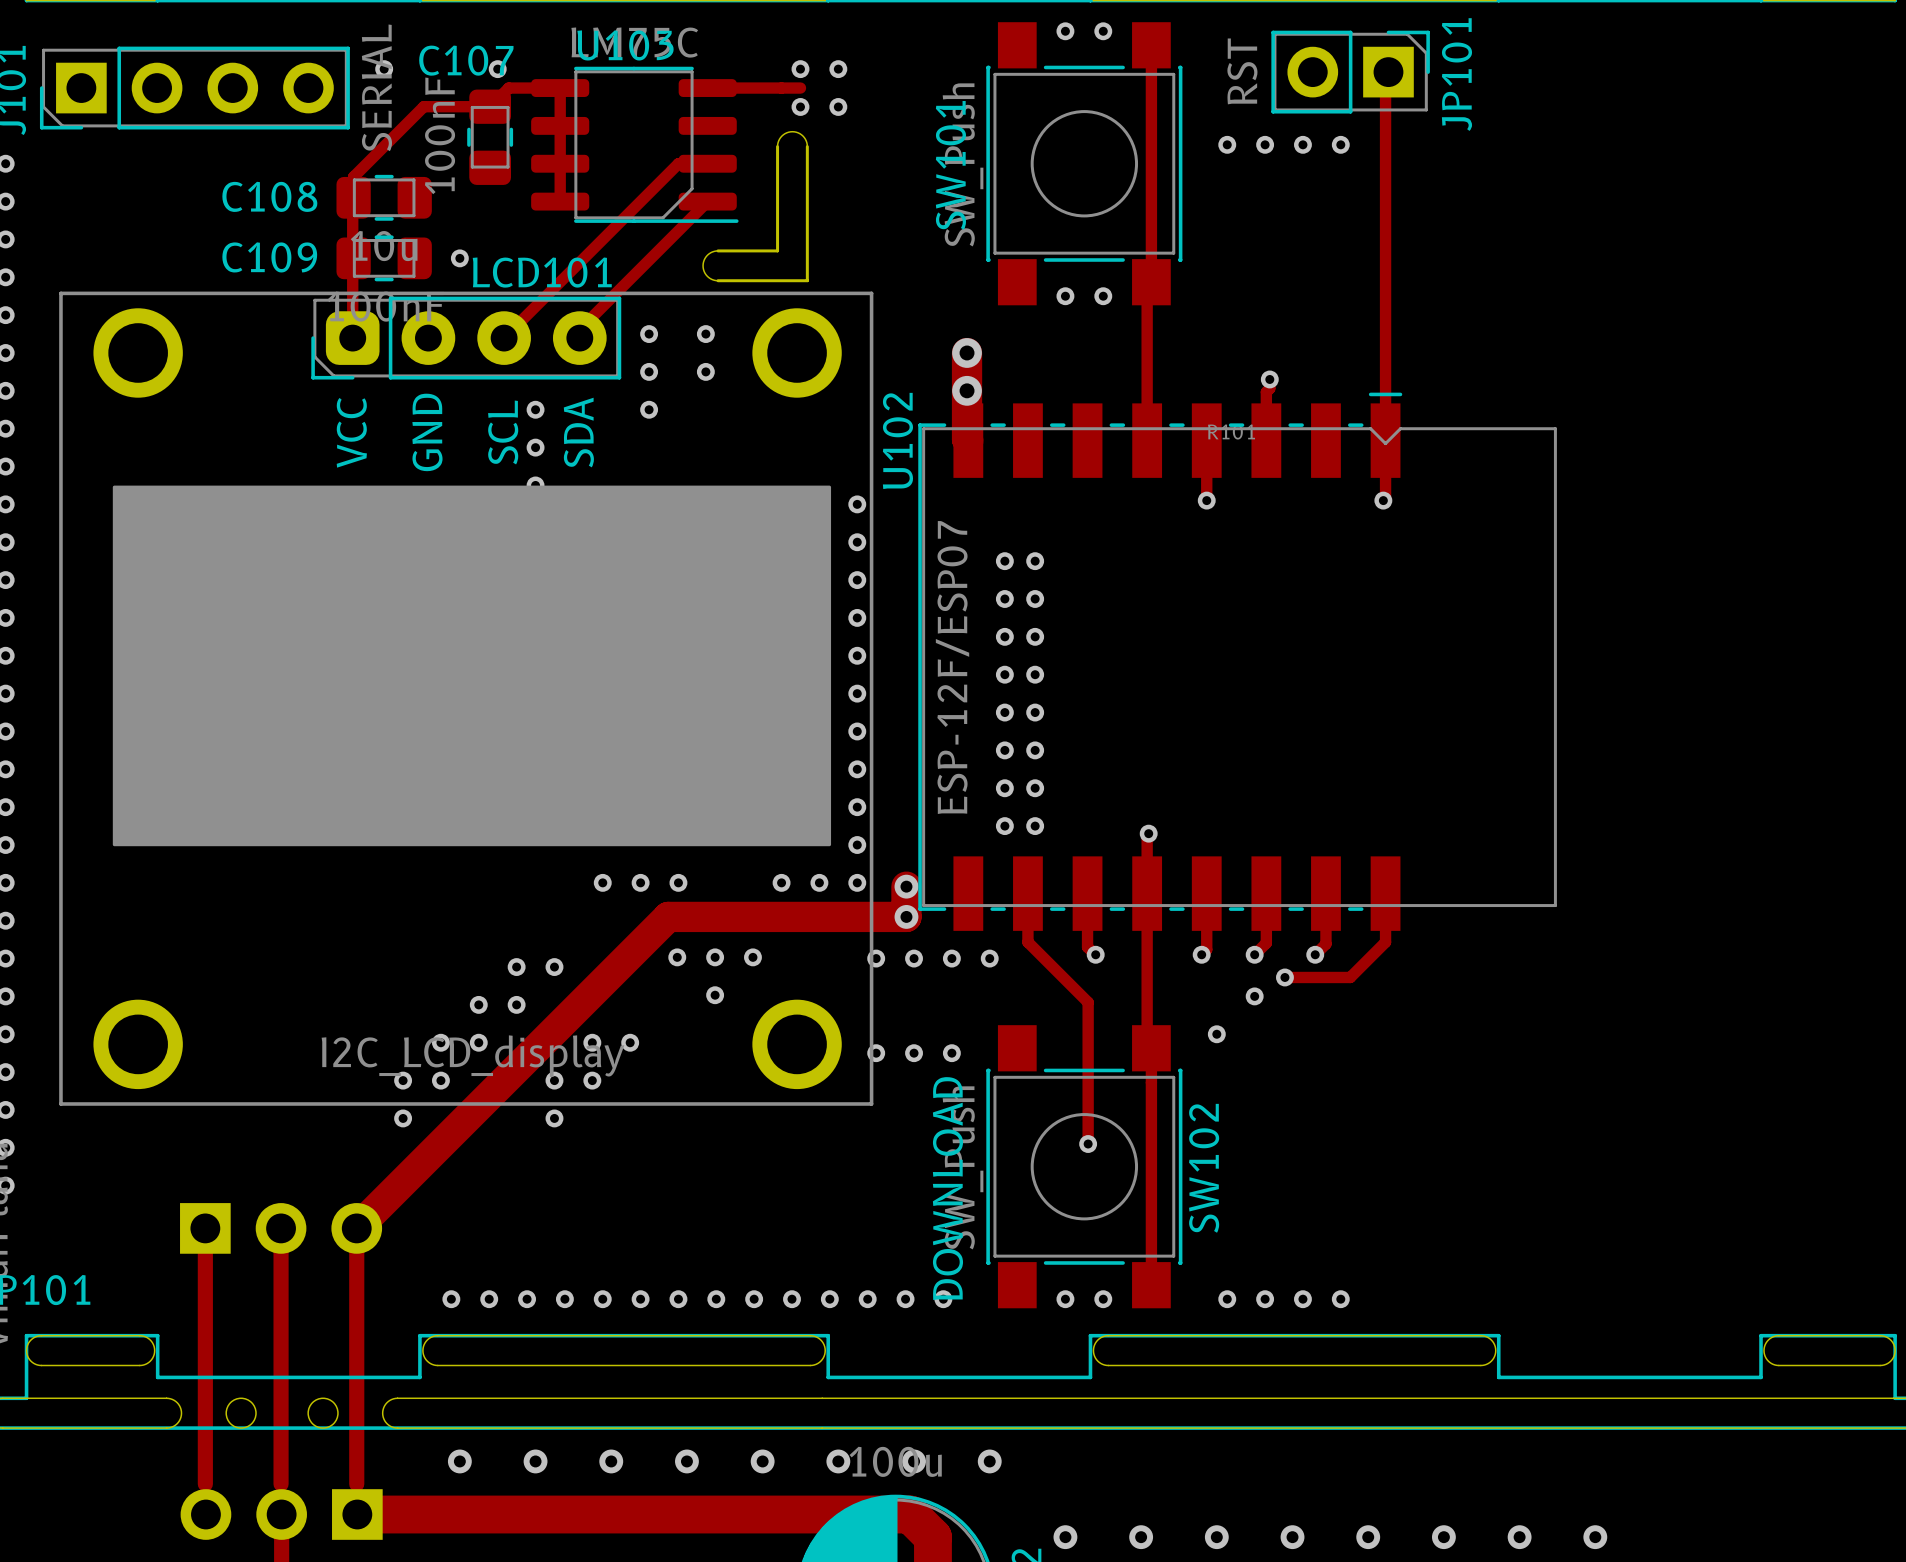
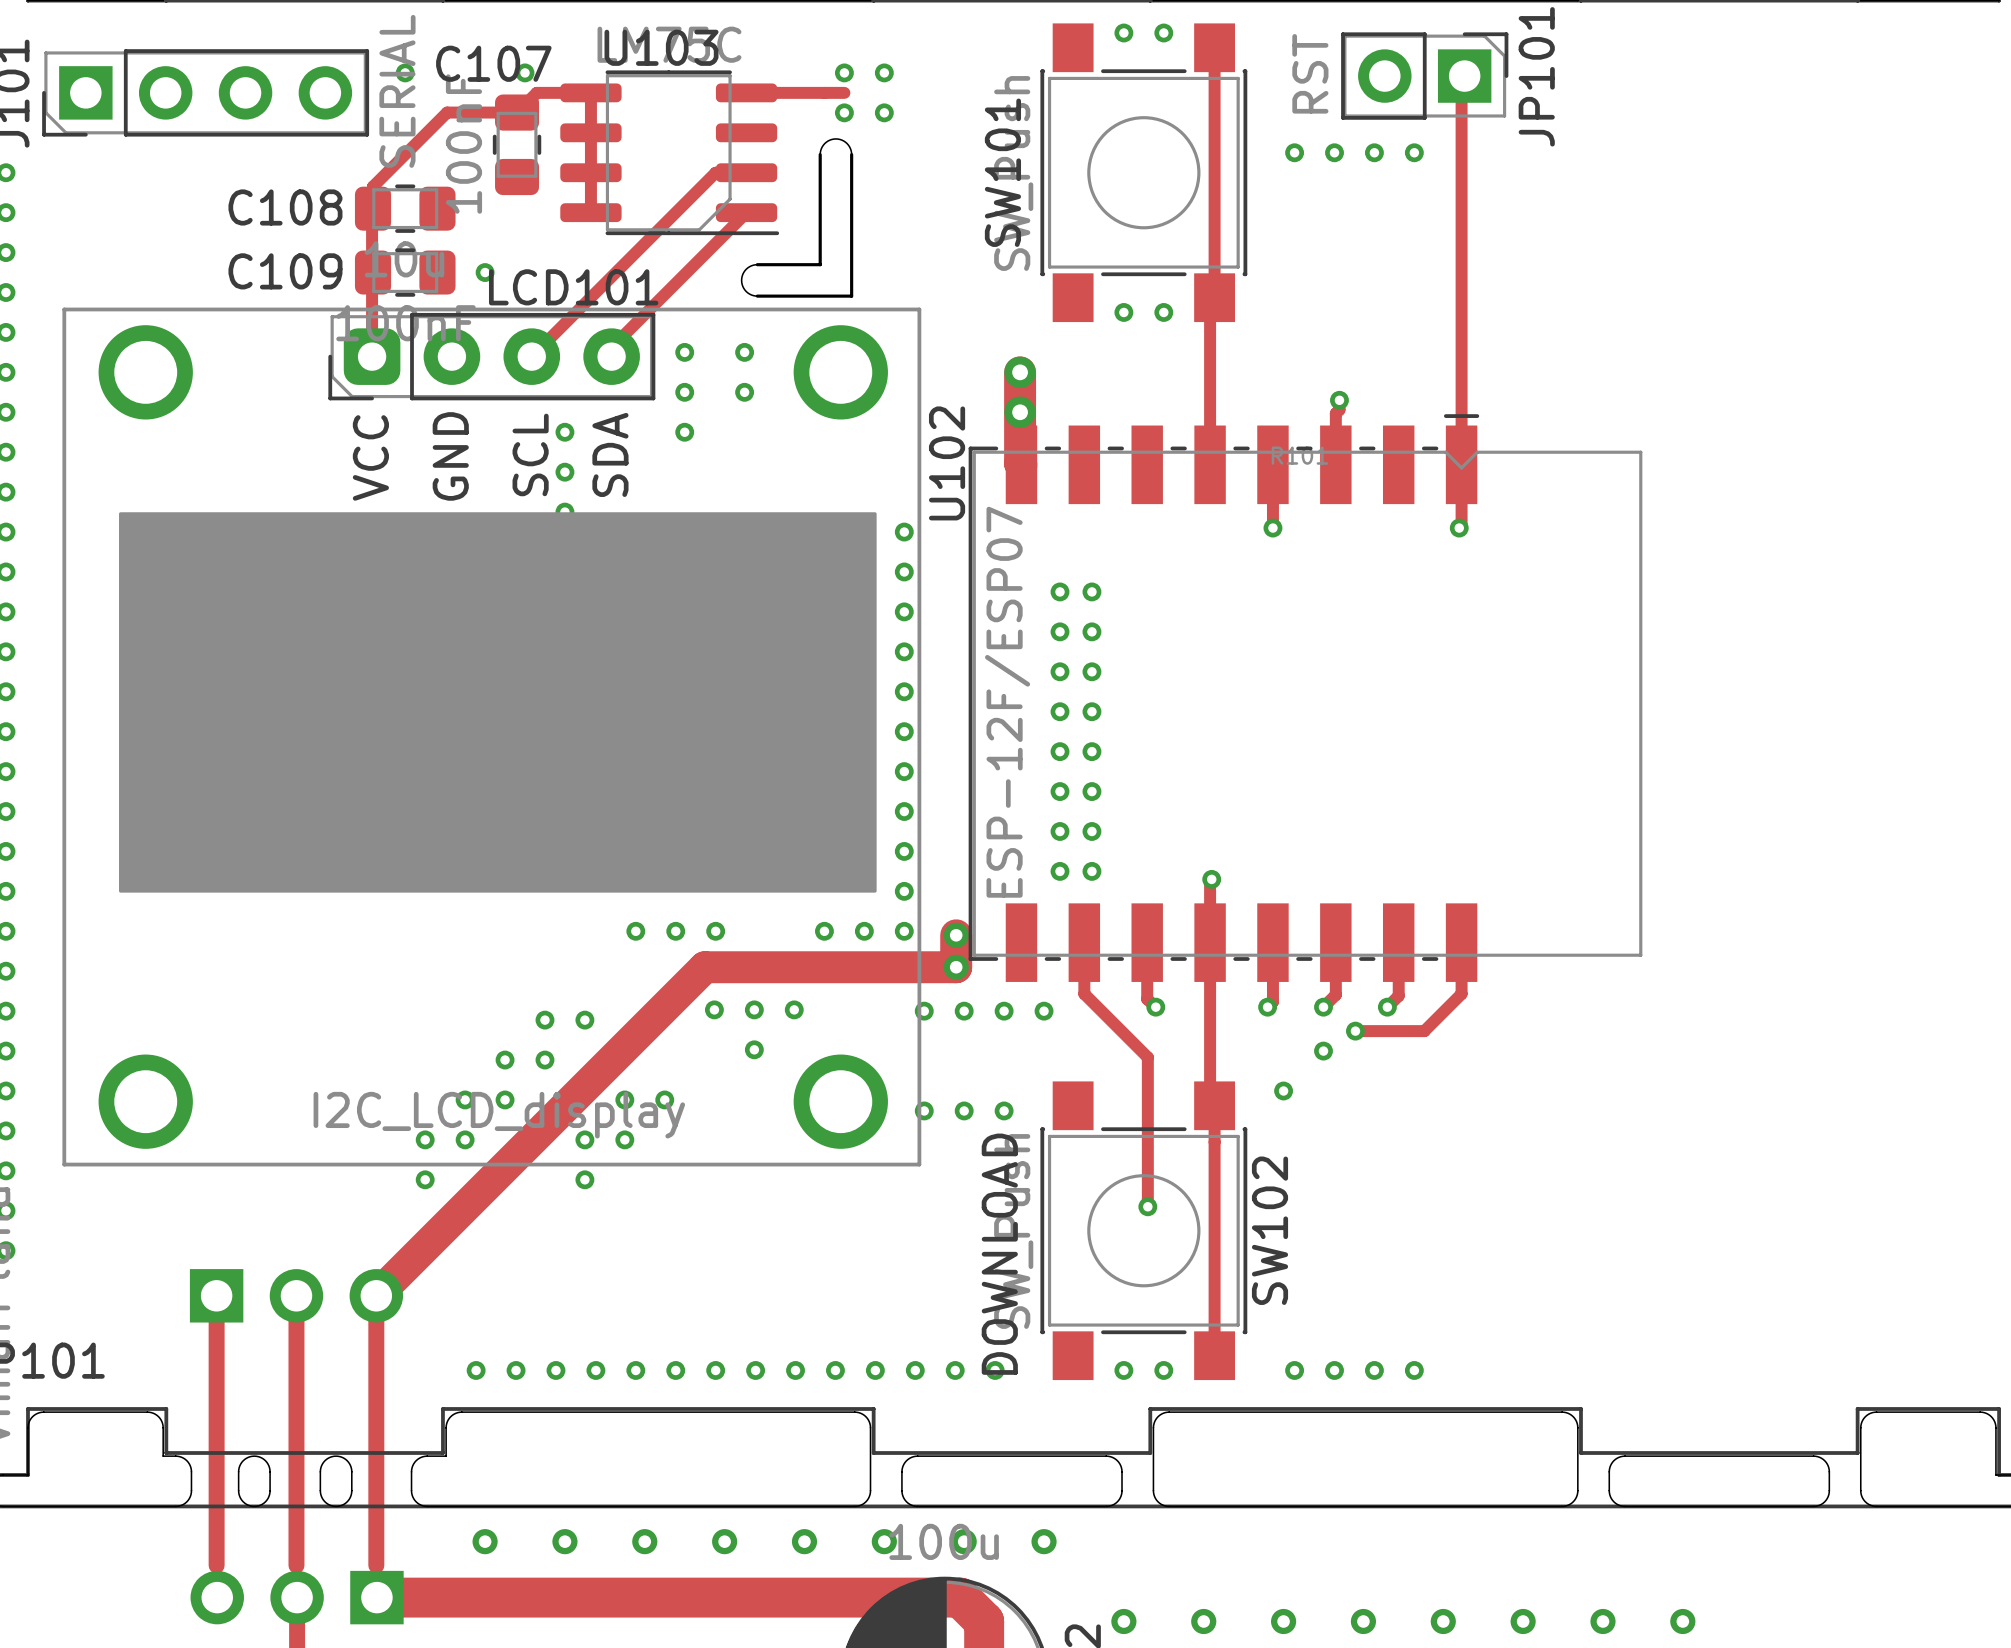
board edge: (41, 1335) (141, 1335) (151, 1341) (154, 1352) (150, 1361) (141, 1365) (39, 1365) (29, 1359) (26, 1348) (32, 1338) (41, 1335) -> none
board edge: (437, 1335) (810, 1335) (820, 1340) (825, 1350) (820, 1361) (810, 1365) (437, 1365) (427, 1361) (422, 1350) (427, 1340) (437, 1335) -> none
board edge: (1108, 1335) (1480, 1335) (1491, 1340) (1495, 1350) (1491, 1361) (1480, 1365) (1108, 1365) (1097, 1361) (1093, 1350) (1097, 1340) (1108, 1335) -> none
board edge: (1778, 1335) (1882, 1335) (1892, 1341) (1894, 1352) (1890, 1361) (1882, 1365) (1776, 1365) (1768, 1361) (1763, 1350) (1768, 1340) (1778, 1335) -> none
board edge: none -> (238, 1471) (238, 1492) (241, 1500) (252, 1506) (263, 1503) (269, 1492) (269, 1469) (266, 1462) (258, 1456) (248, 1457) (241, 1462) (238, 1471)
board edge: none -> (320, 1471) (320, 1492) (323, 1500) (334, 1506) (345, 1503) (351, 1492) (351, 1469) (348, 1462) (340, 1456) (330, 1457) (323, 1462) (320, 1471)
round board edge: [225, 1397, 257, 1429] -> none
round board edge: [307, 1397, 339, 1429] -> none
board edge: (26, 1398) (170, 1398) (178, 1404) (181, 1415) (175, 1425) (166, 1428) -> (28, 1475) (28, 1425) (31, 1418) (35, 1414) (43, 1412) (151, 1412) (158, 1416) (162, 1423) (163, 1456) (181, 1457) (188, 1462) (190, 1467) (190, 1496) (185, 1503) (175, 1506)
board edge: (1892, 1398) (397, 1398) (390, 1400) (383, 1409) (384, 1420) (391, 1426) (405, 1428) -> (854, 1506) (865, 1501) (870, 1490) (869, 1423) (864, 1415) (854, 1412) (457, 1412) (450, 1416) (446, 1423) (446, 1456) (421, 1457) (414, 1462) (412, 1467) (412, 1496) (417, 1503) (427, 1506)
board edge: (810, 1428) (869, 1428) -> (1106, 1506) (1117, 1501) (1122, 1490) (1120, 1465) (1115, 1459) (1106, 1456) (913, 1456) (906, 1460) (902, 1467) (902, 1492) (908, 1503) (917, 1506)
board edge: (1048, 1428) (1108, 1428) -> (1562, 1506) (1573, 1501) (1577, 1490) (1577, 1423) (1571, 1415) (1562, 1412) (1165, 1412) (1158, 1416) (1153, 1425) (1153, 1490) (1158, 1501) (1169, 1506)
board edge: (1480, 1428) (1540, 1428) -> (1813, 1506) (1824, 1501) (1829, 1490) (1828, 1465) (1823, 1459) (1813, 1456) (1620, 1456) (1613, 1460) (1609, 1467) (1609, 1492) (1615, 1503) (1624, 1506)
board edge: (1719, 1428) (1778, 1428) -> (1995, 1475) (1995, 1425) (1992, 1418) (1988, 1414) (1980, 1412) (1872, 1412) (1865, 1416) (1860, 1425) (1860, 1490) (1865, 1501) (1876, 1506)

